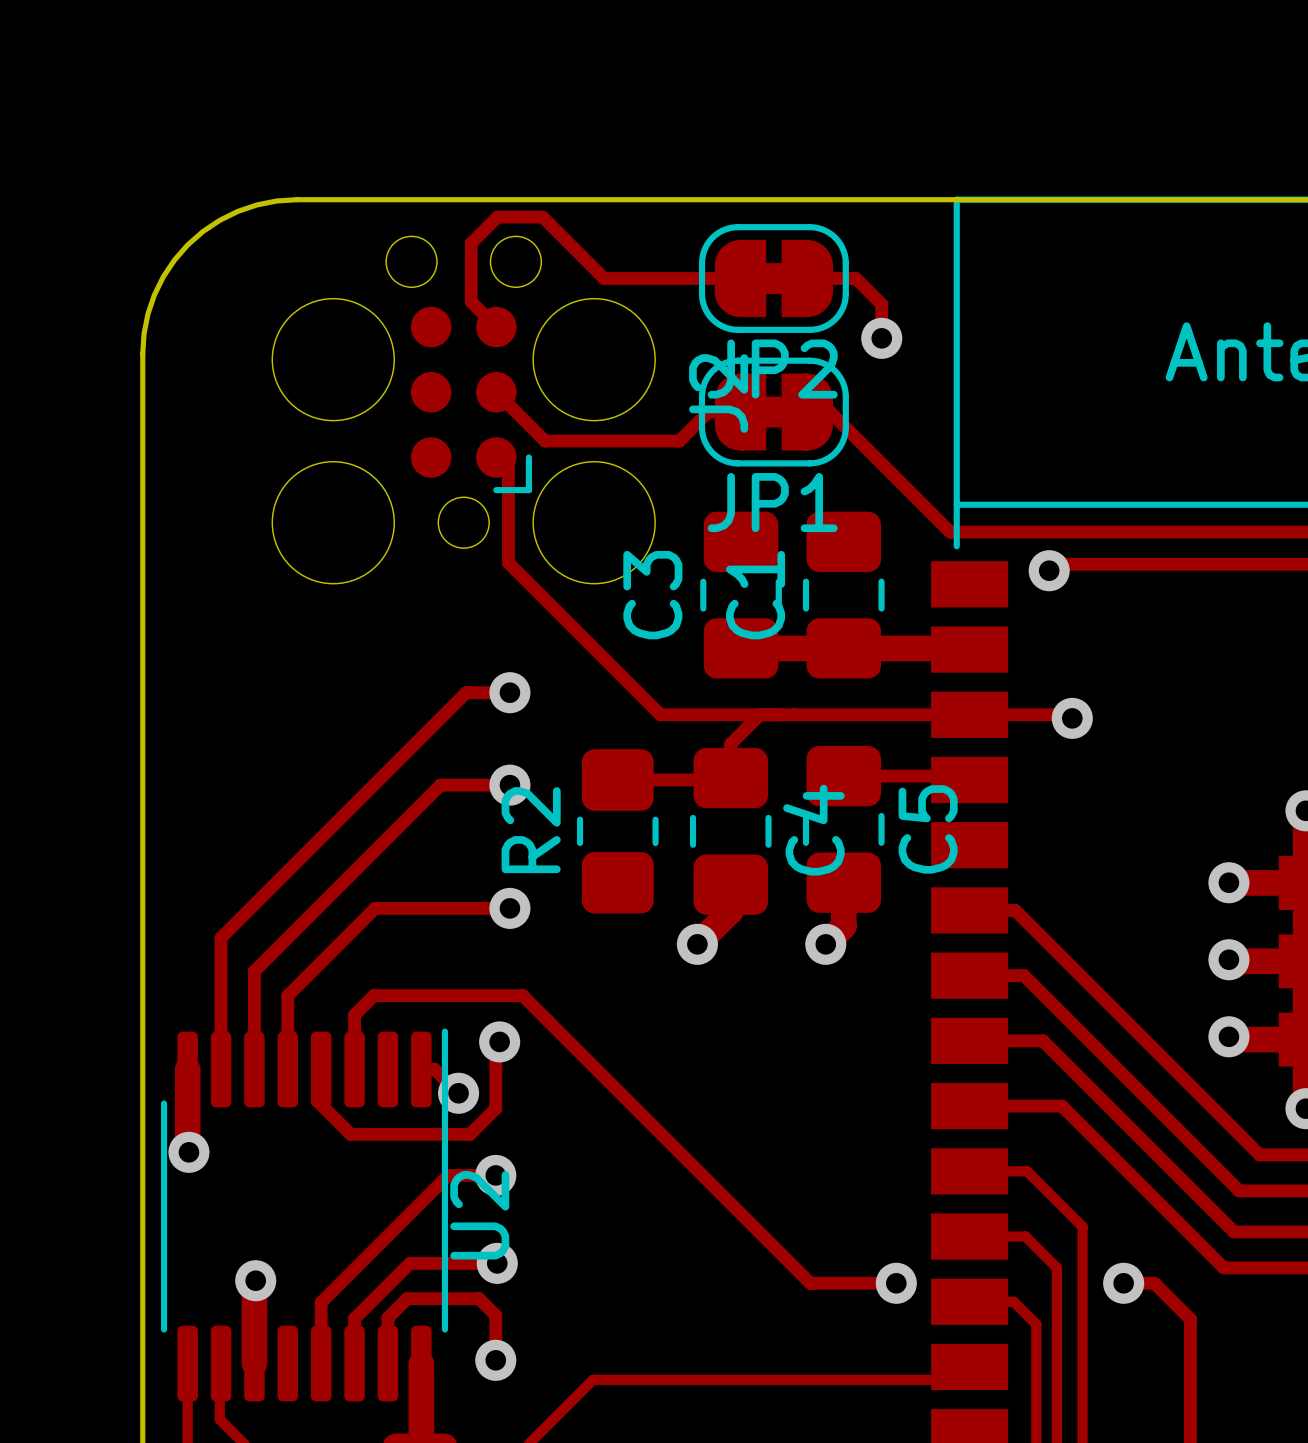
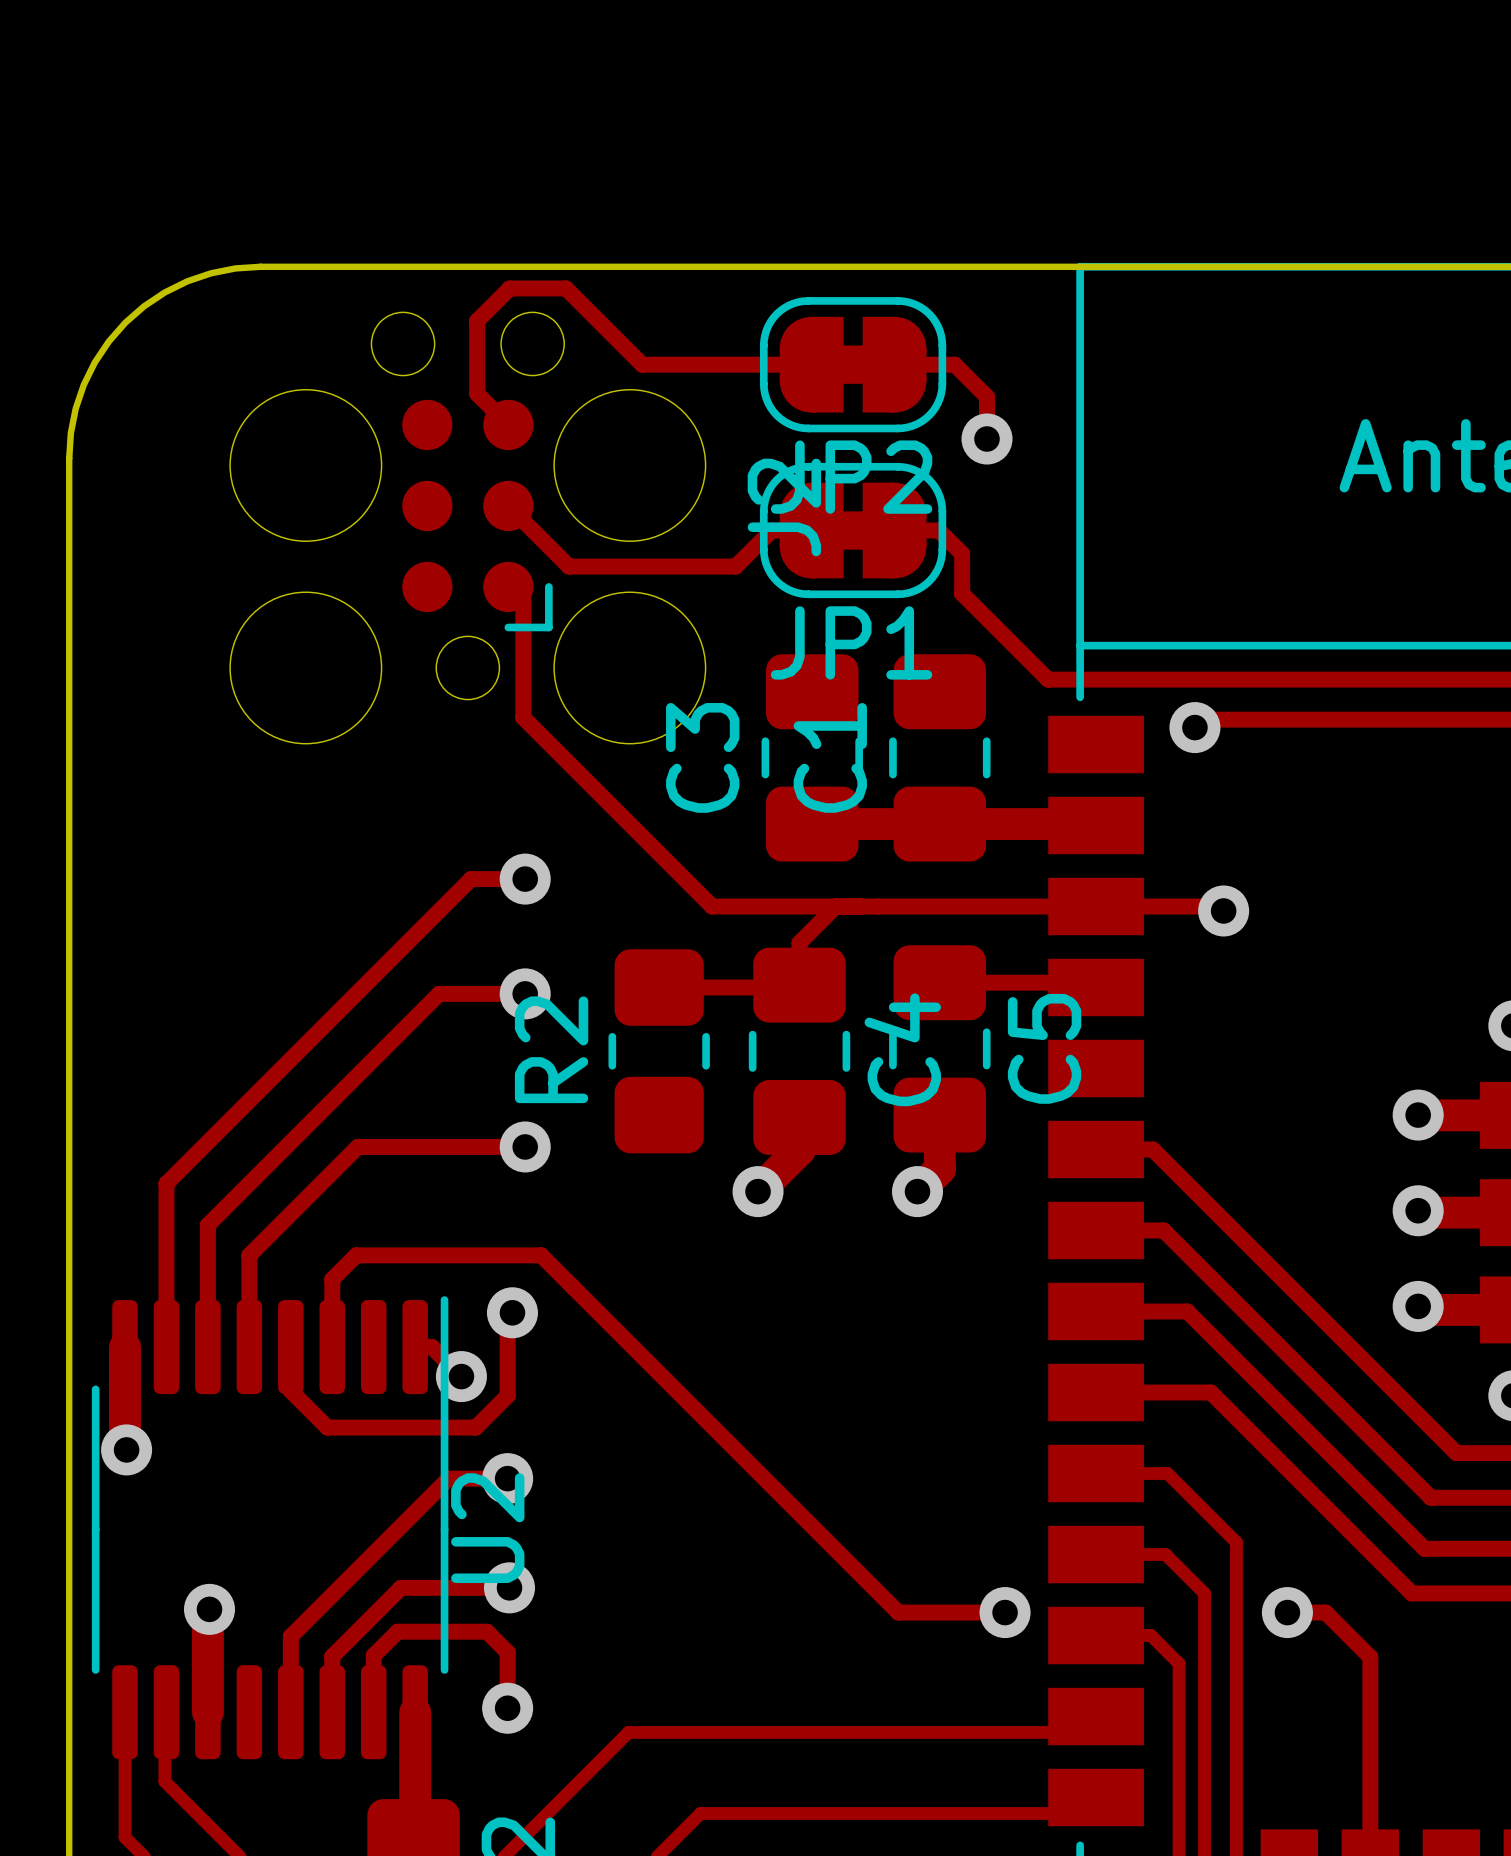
track: (830, 412) (950, 532) -> (922, 530) (938, 530) (962, 553) (962, 593) (1048, 679) (1072, 679)

